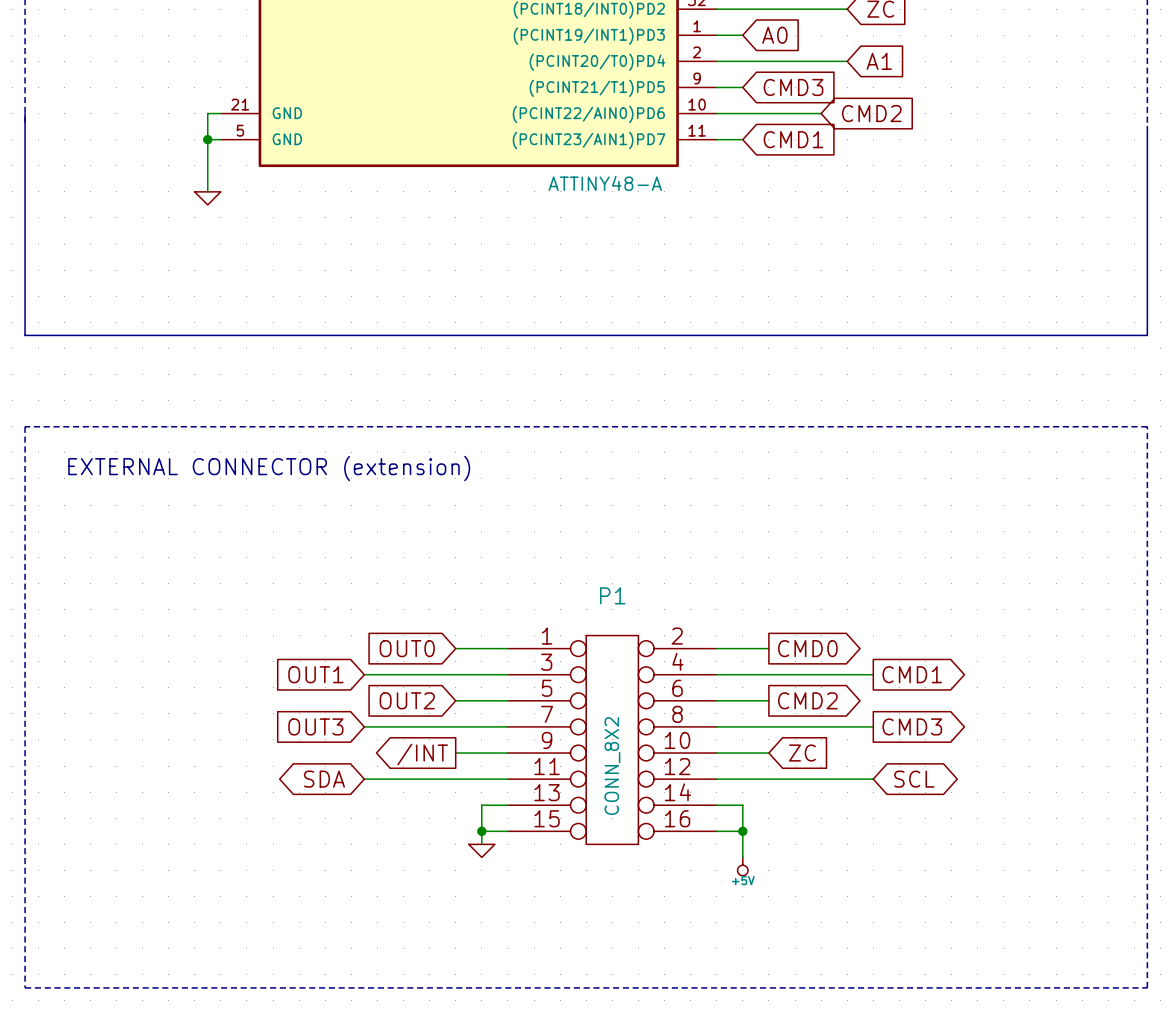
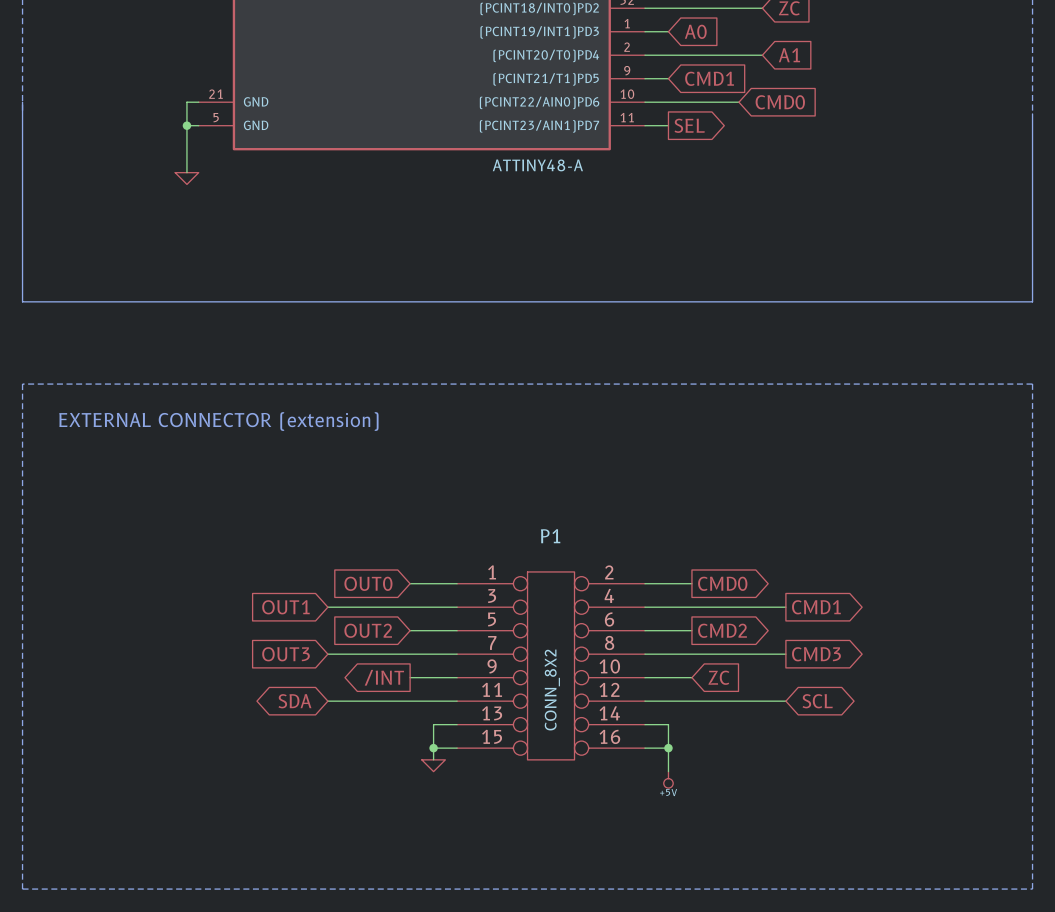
global label: CMD3 (793, 87) -> CMD1 (709, 78)
global label: CMD2 (871, 113) -> CMD0 (780, 102)
global label shape: input (793, 139) -> output (689, 125)
global label: CMD1 (793, 139) -> SEL (689, 125)

